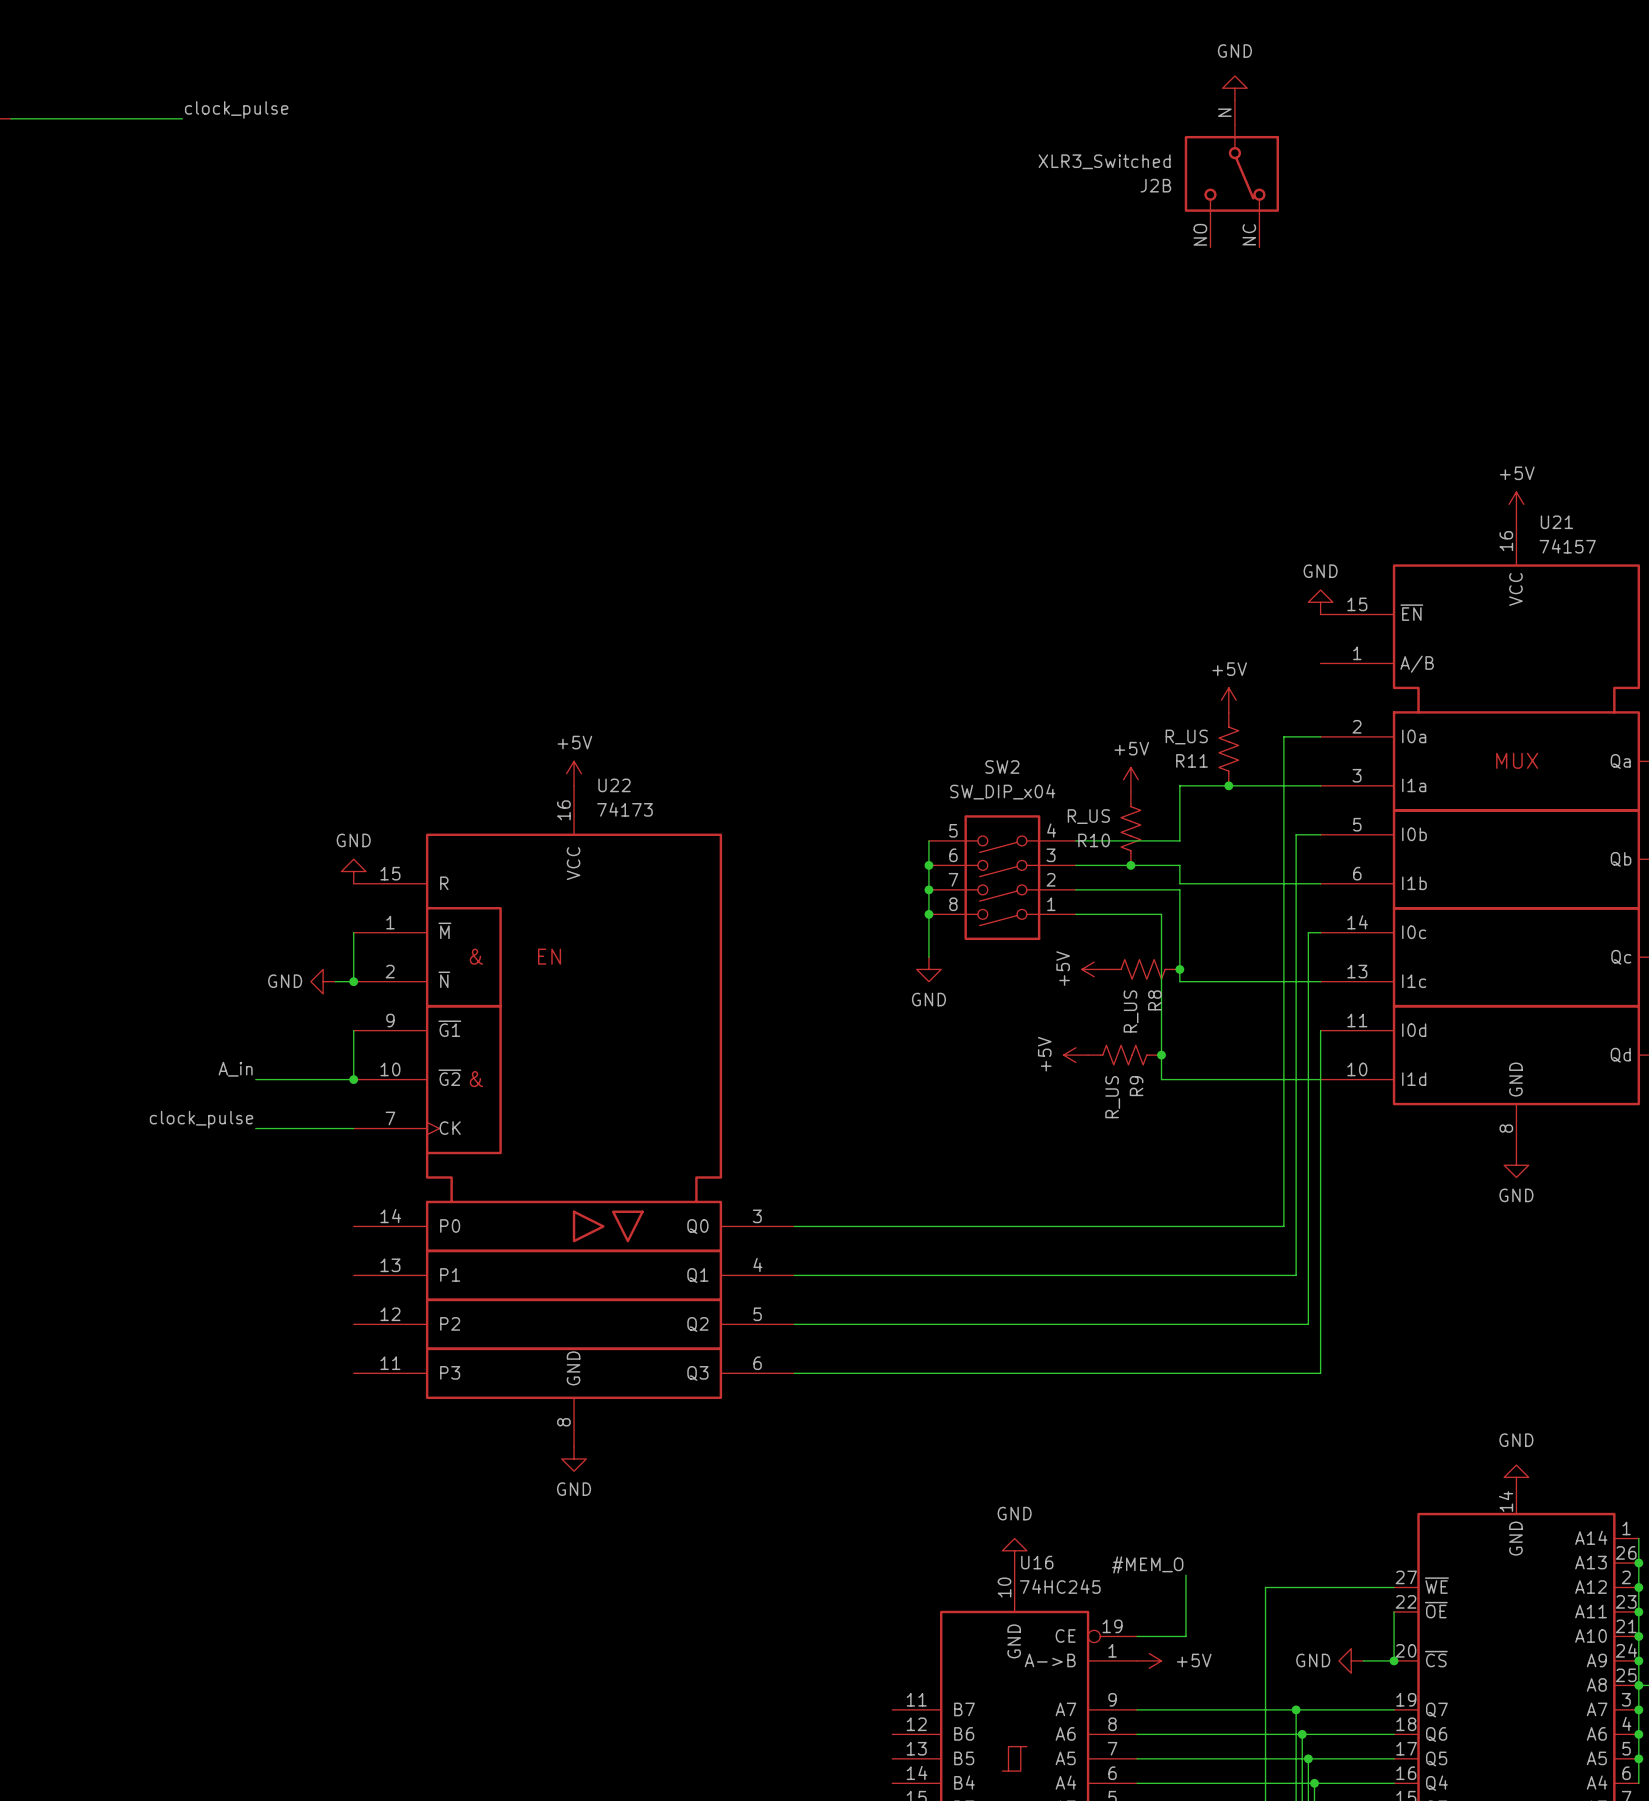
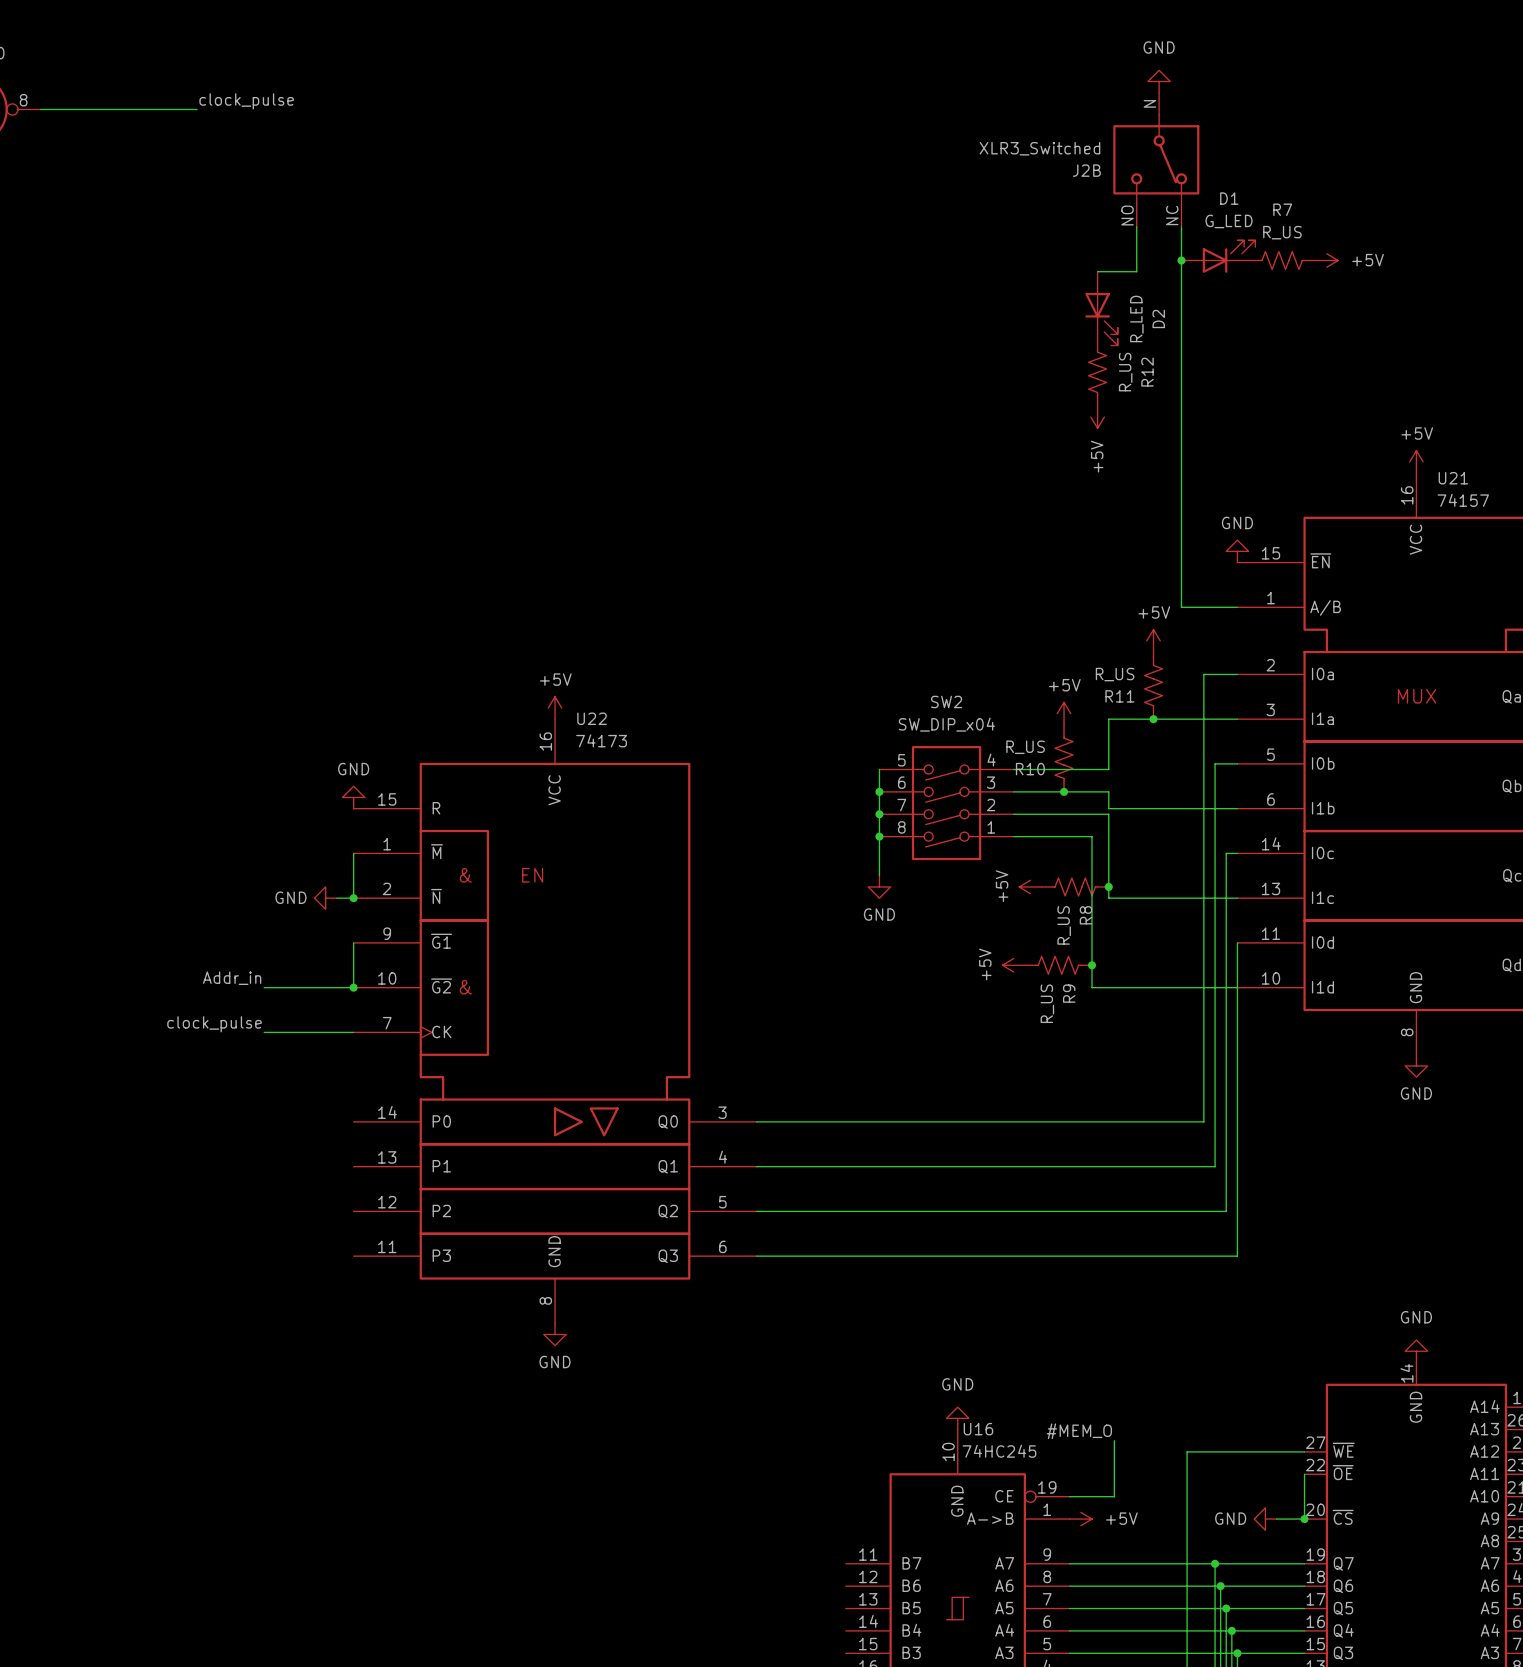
wire: none -> (1136, 226) (1136, 271) (1097, 271)
wire: none -> (1181, 226) (1181, 607) (1237, 607)
D1: none -> G_LED (1218, 256)
junction: none -> (1181, 260)
R7: none -> R_US (1282, 260)
power symbol: none -> +5V (1326, 260)
D2: none -> R_LED (1101, 308)
R12: none -> R_US (1097, 372)
power symbol: none -> +5V (1097, 417)
label: A_in (235, 1069) -> Addr_in (232, 978)

